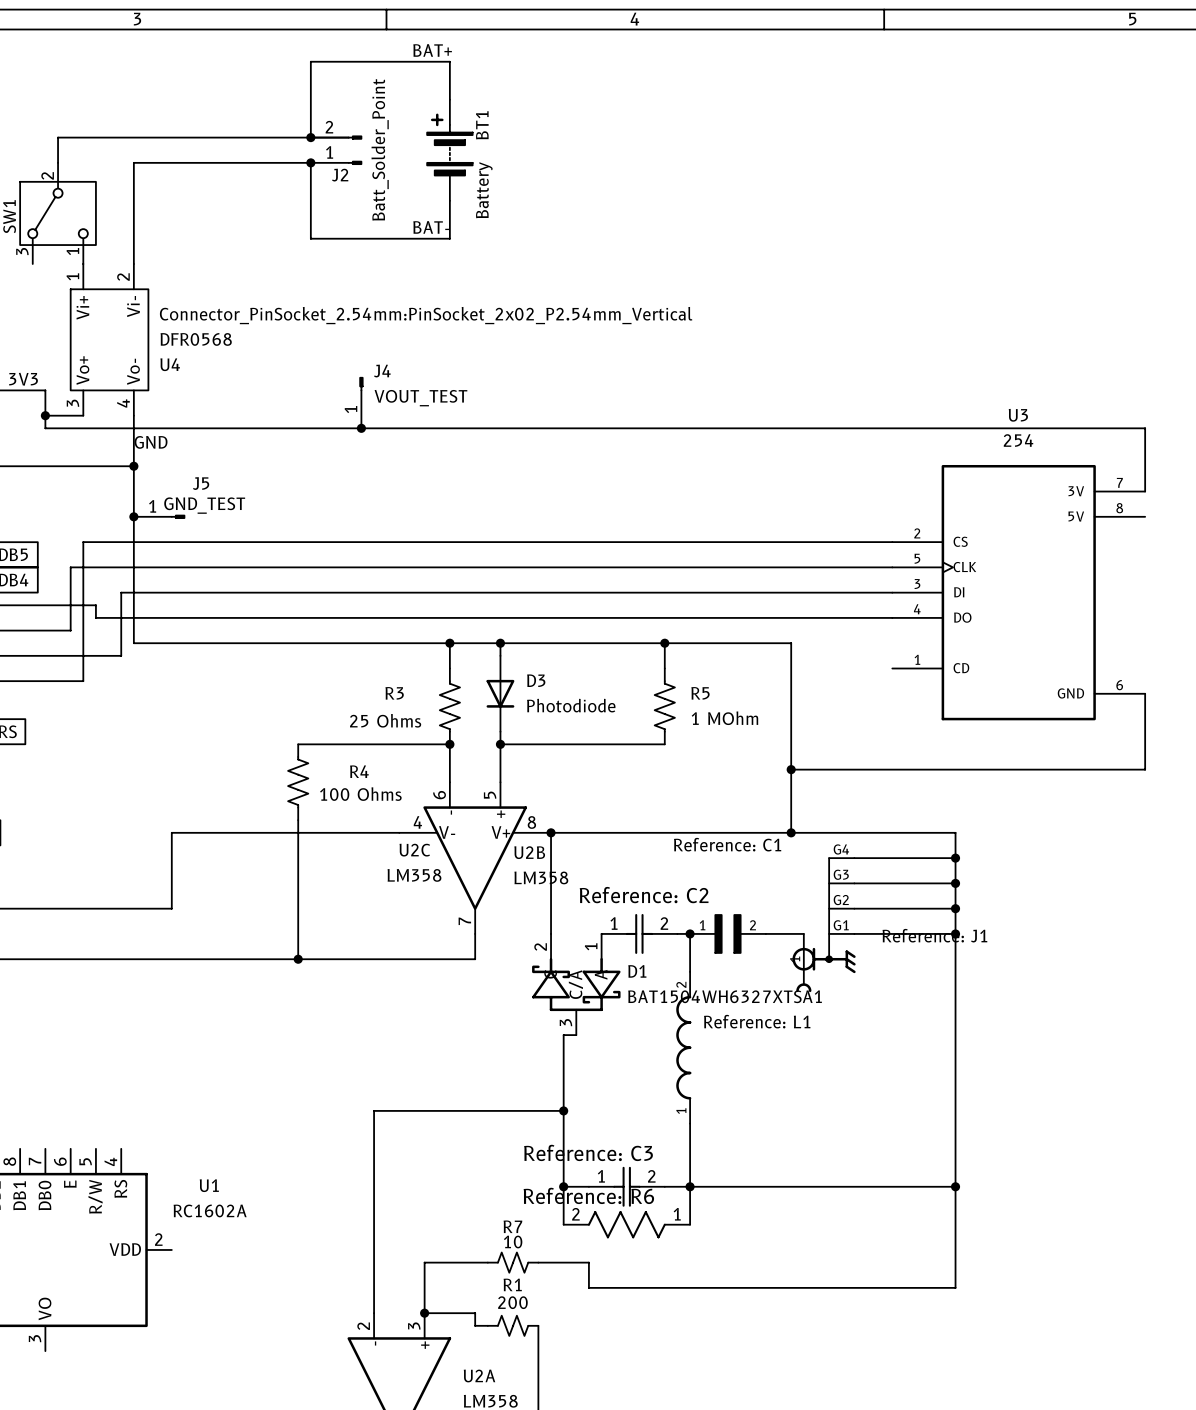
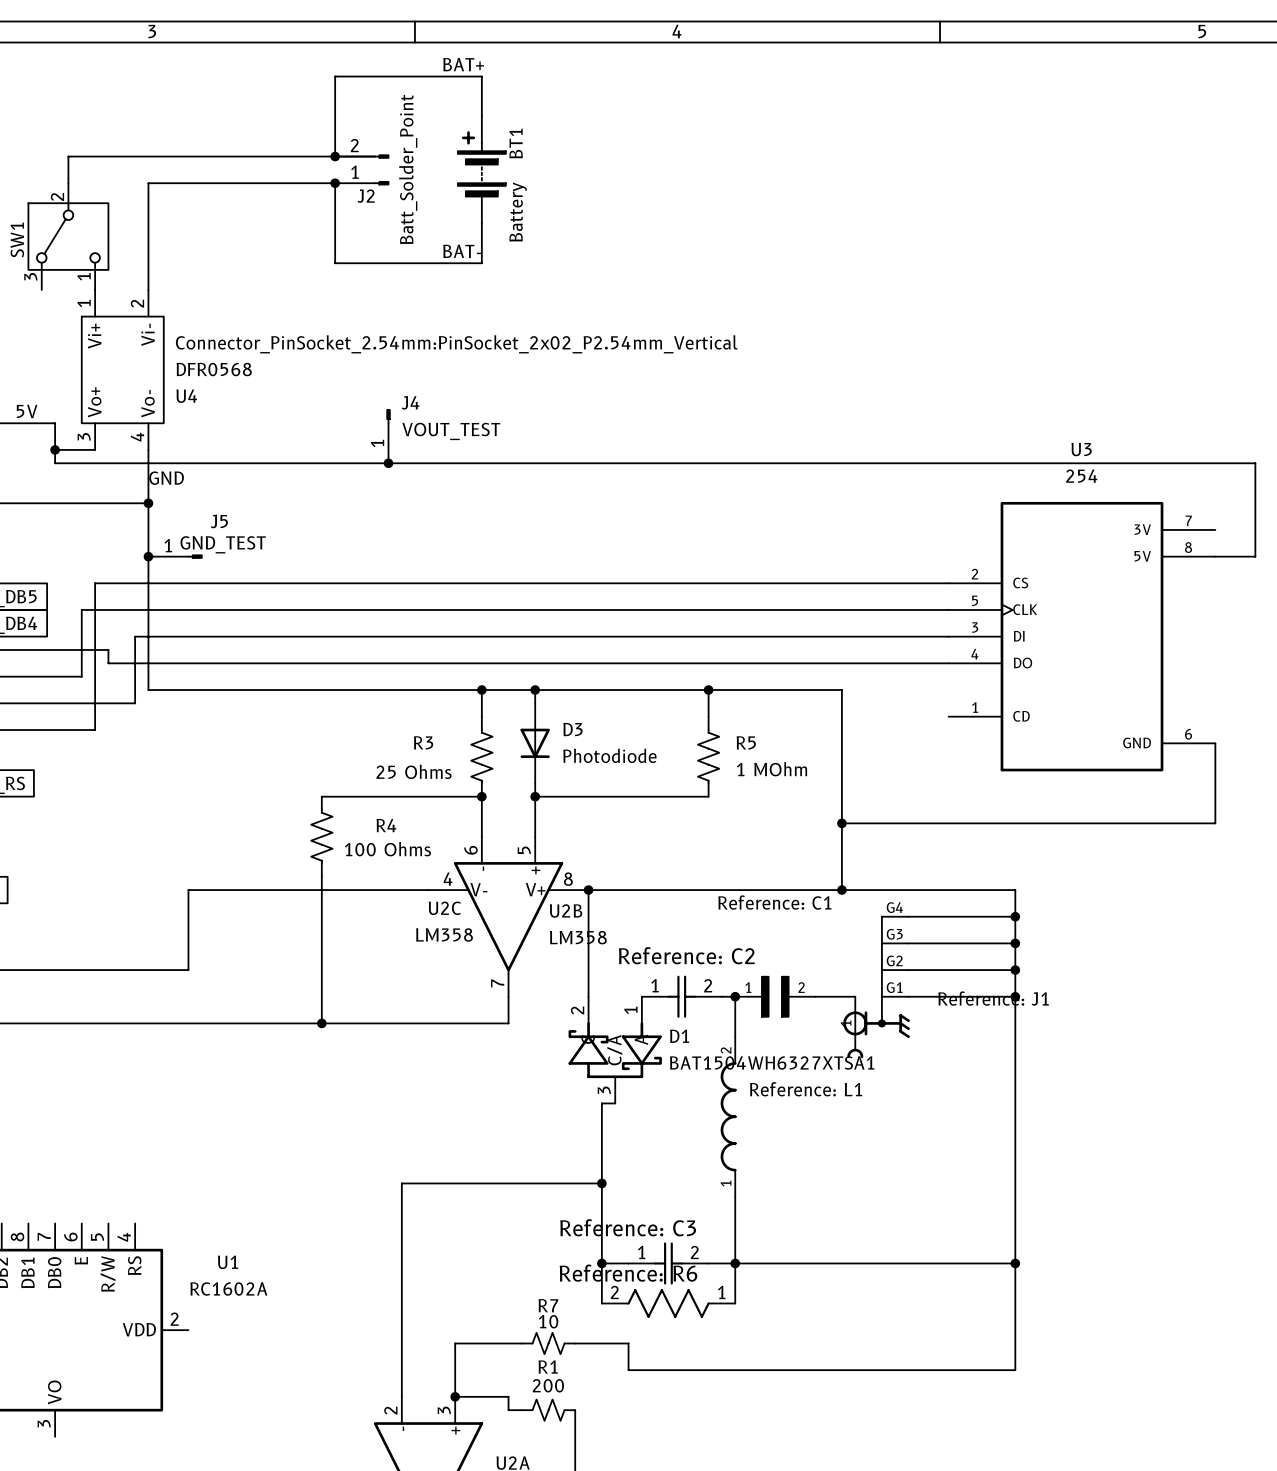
label: 3V3 (23, 379) -> 5V (27, 411)
wire: (1145, 428) (1145, 491) -> (1215, 463) (1255, 463) (1255, 556) (1215, 556)

